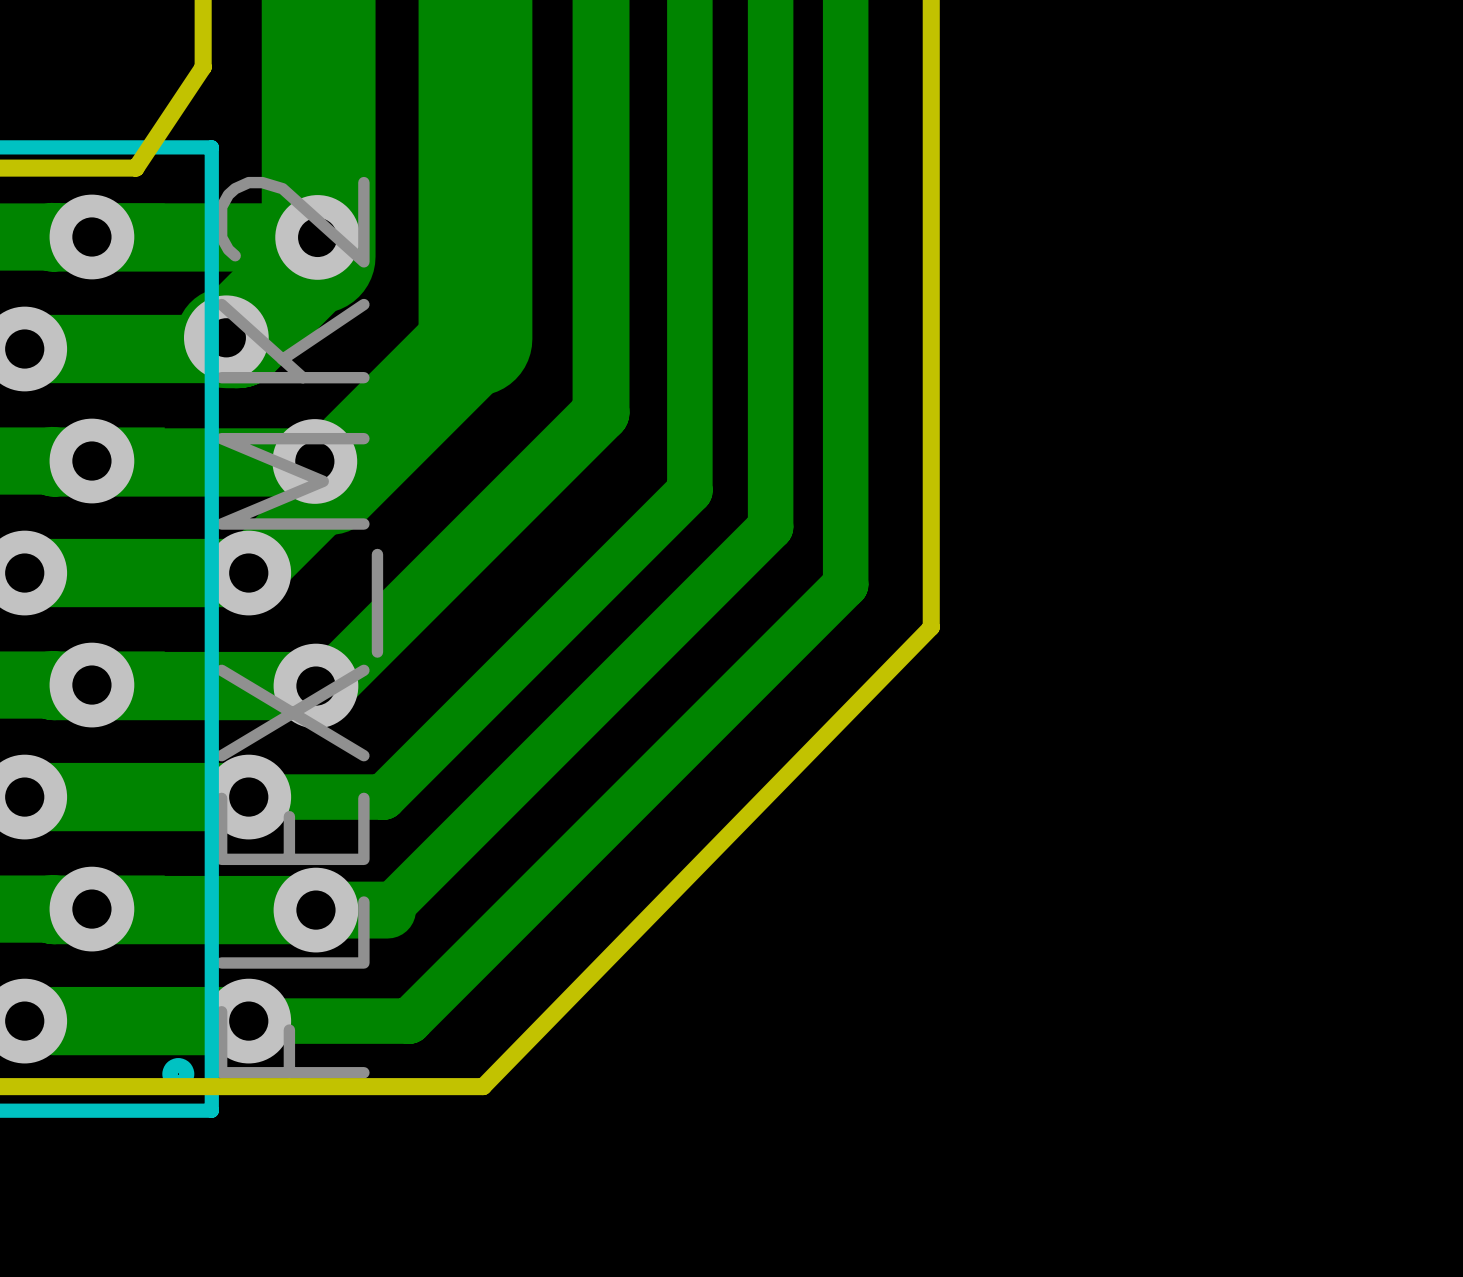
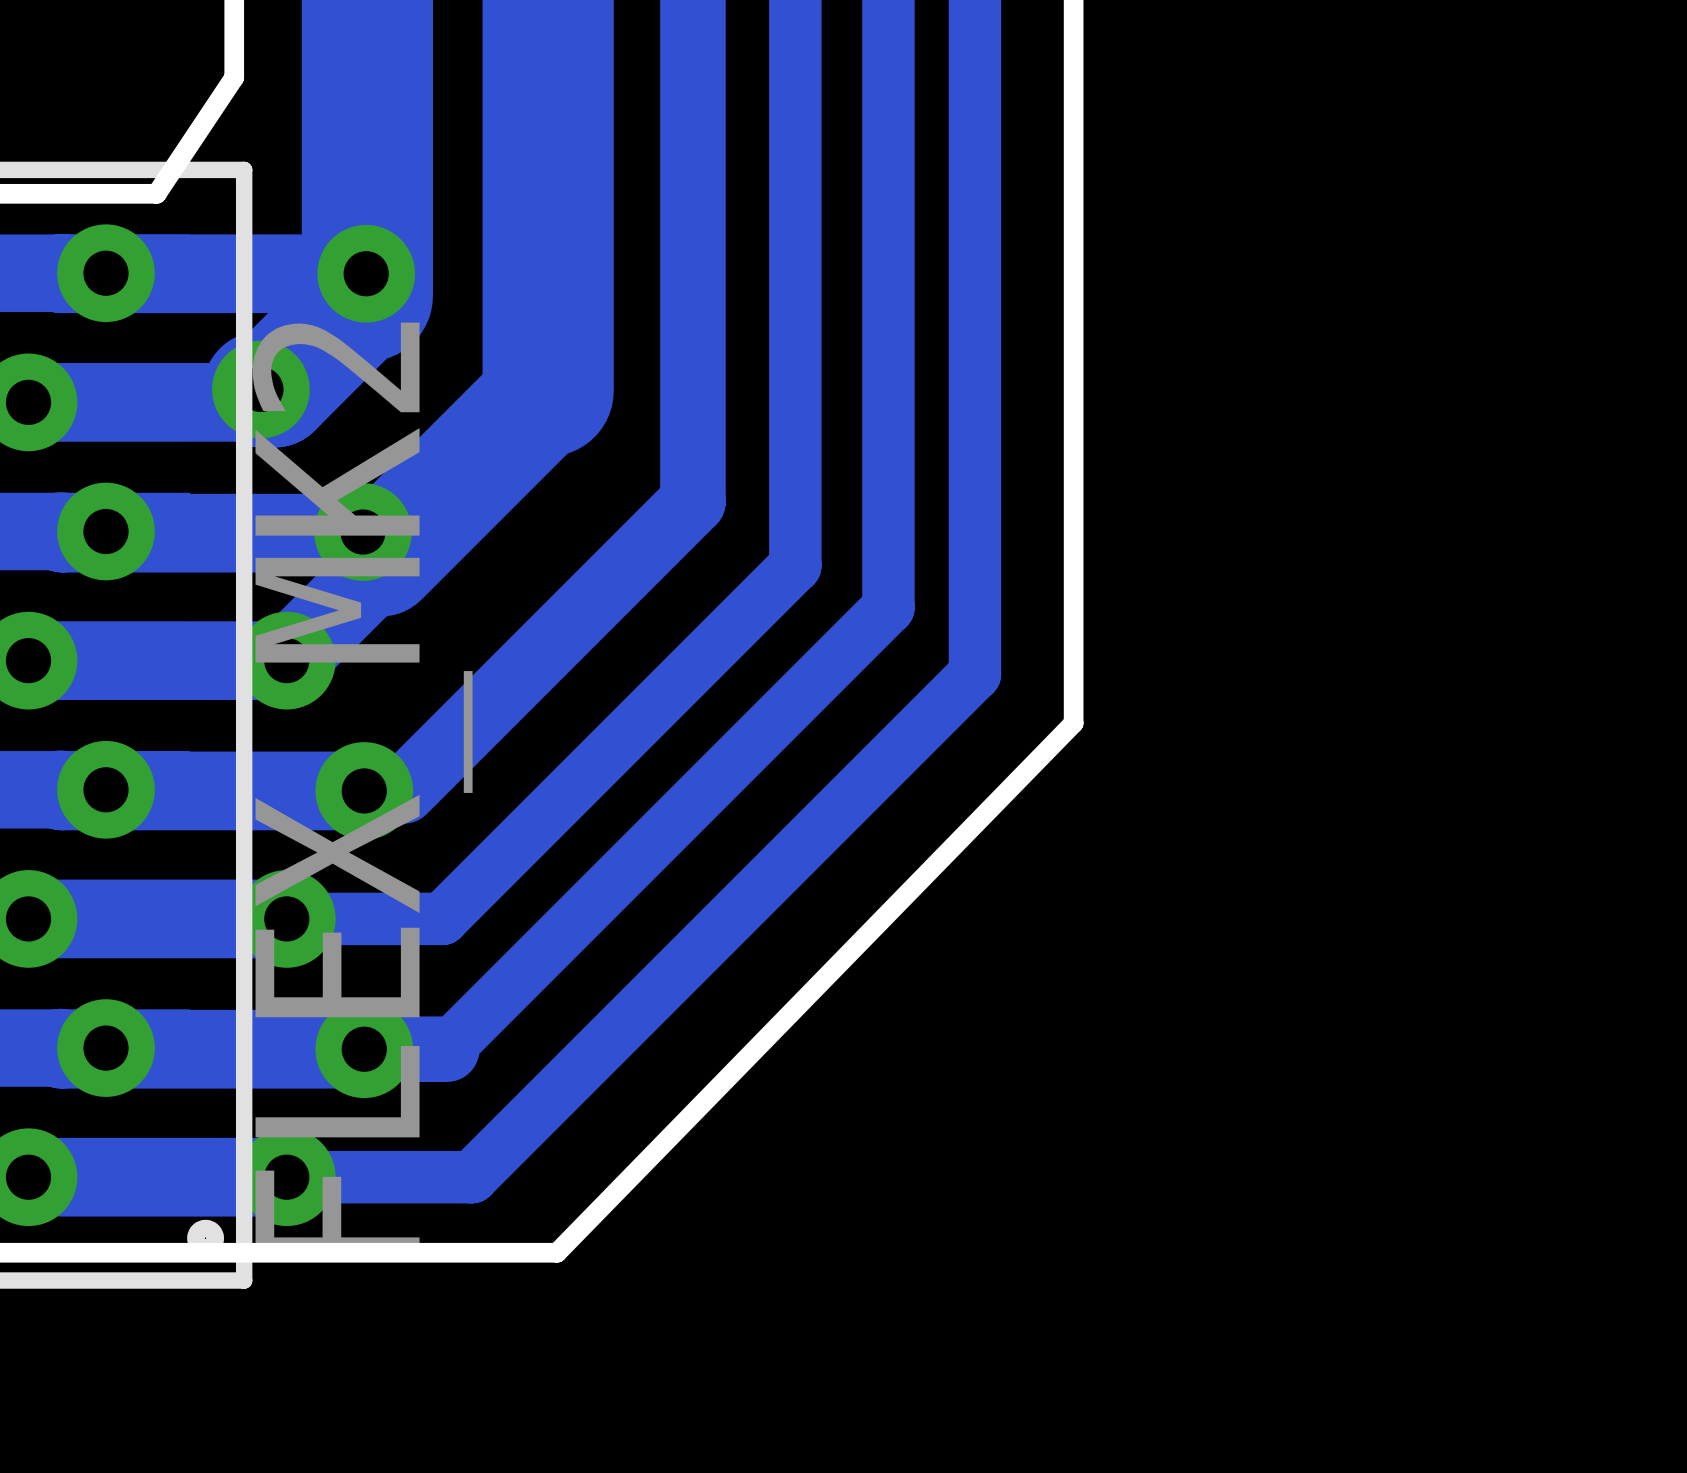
track: (601, 412) (327, 686) -> (692, 475) (692, 501) (403, 790) (377, 790)

